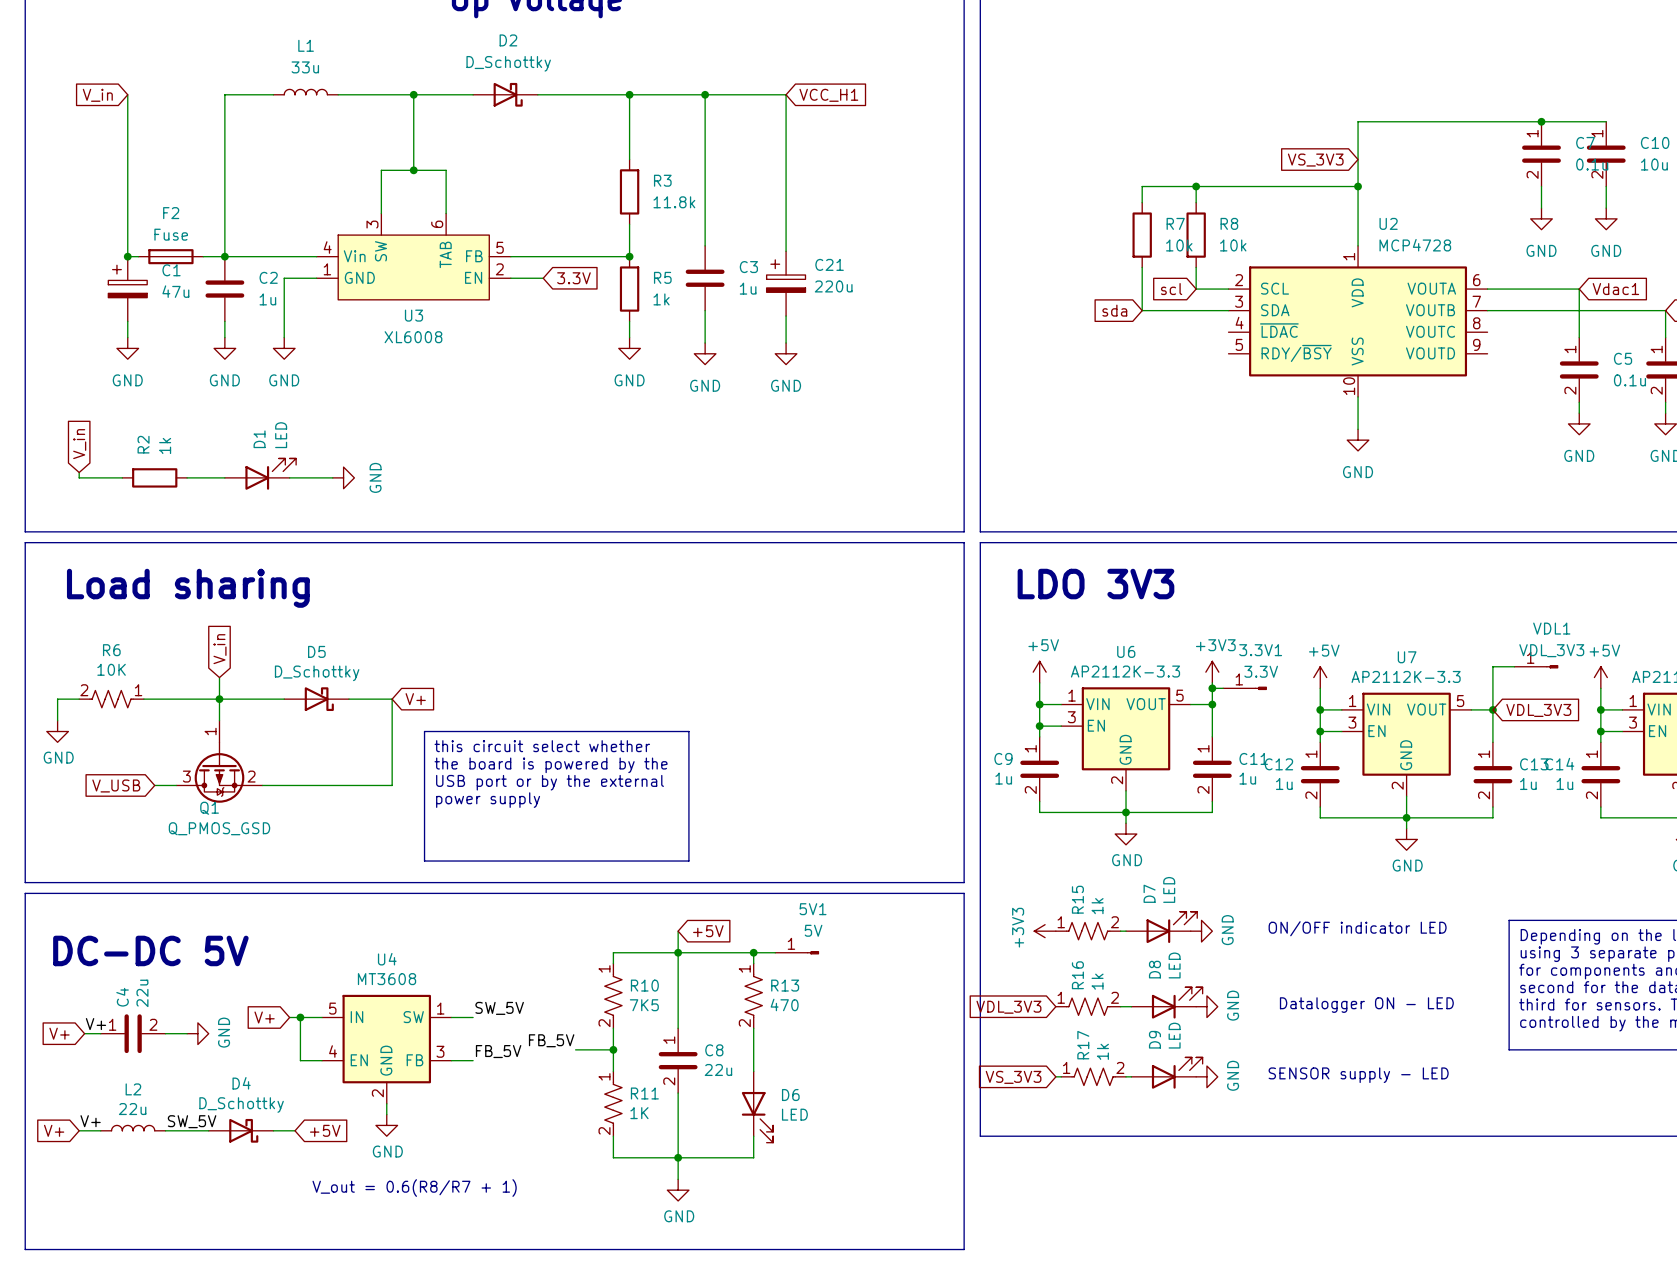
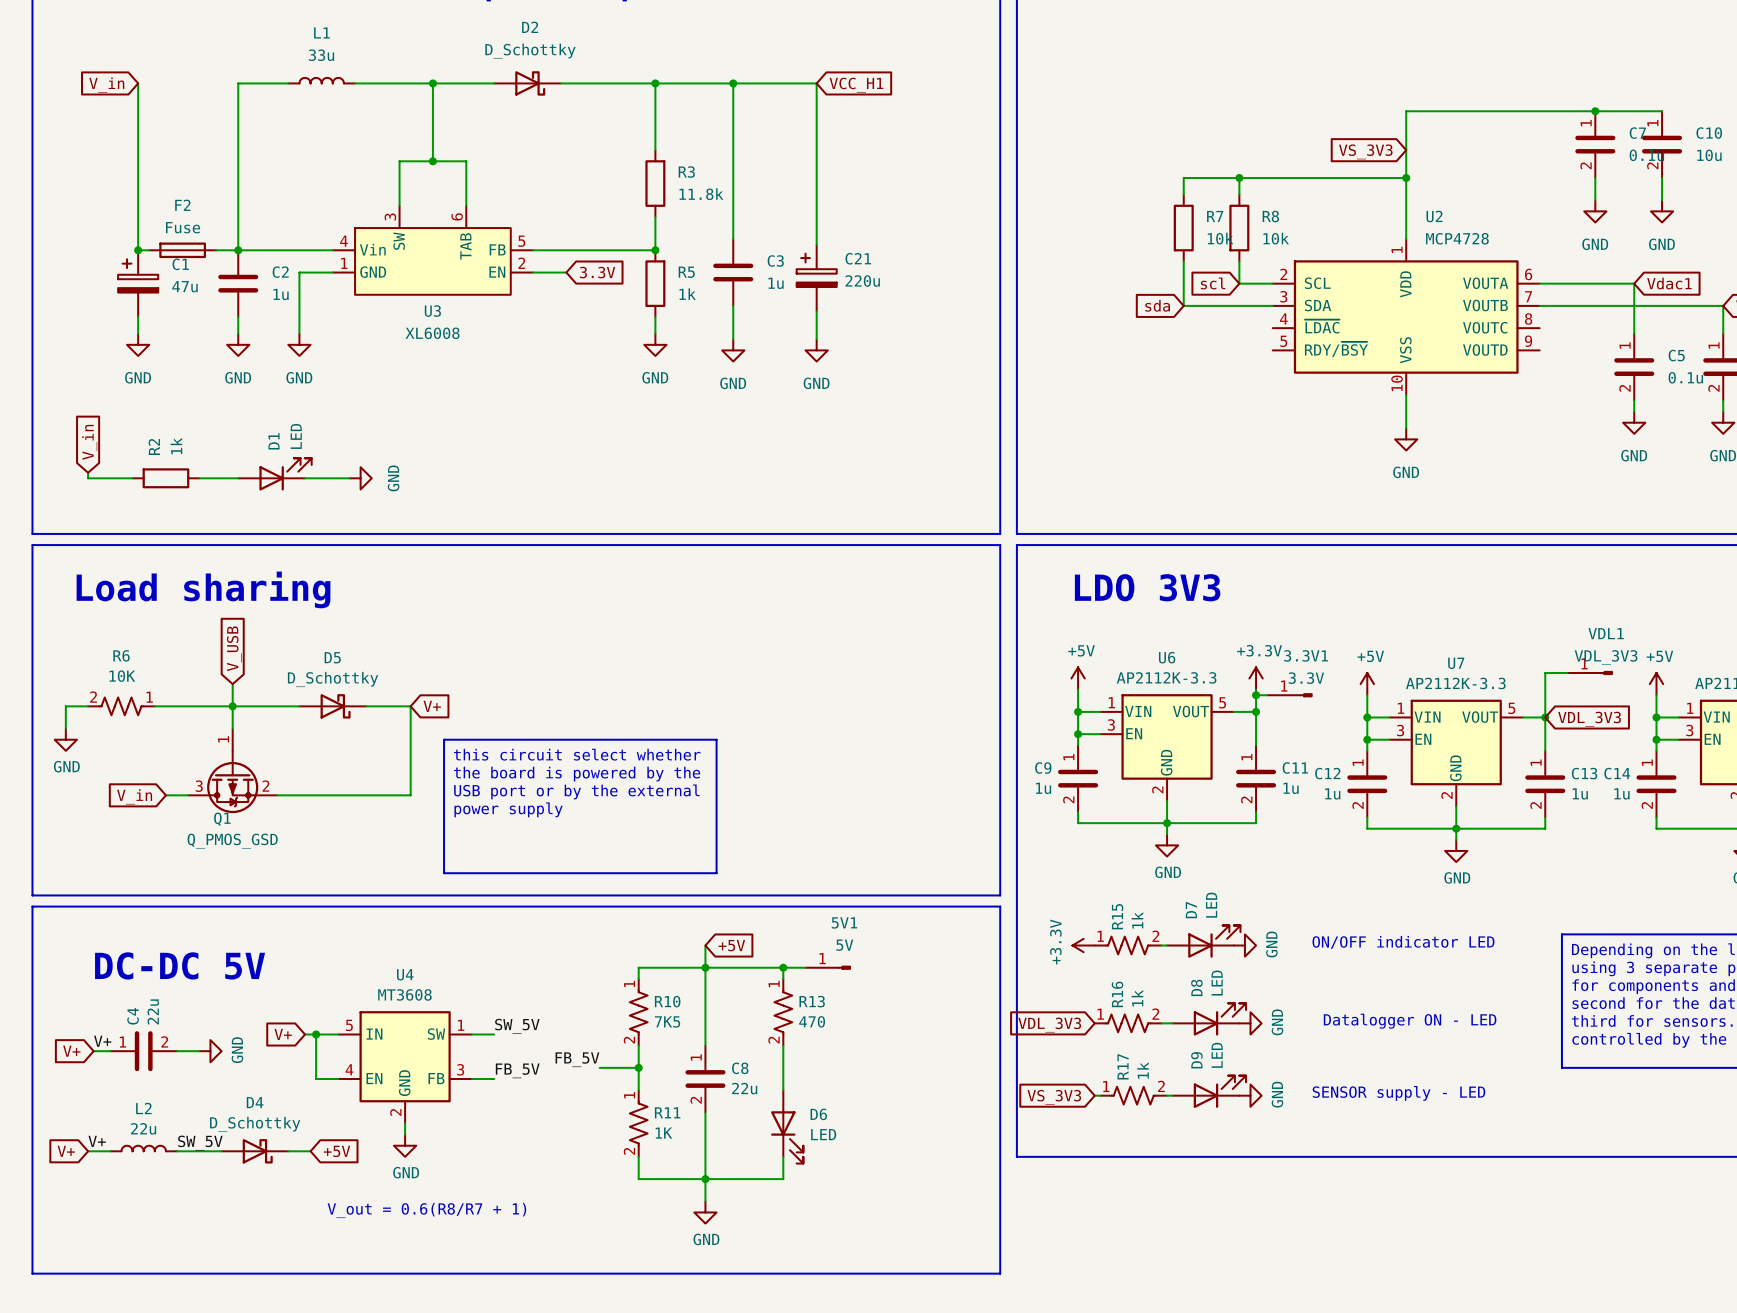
global label: V_in (220, 649) -> V_USB (234, 648)
power symbol: +3V3 (1212, 672) -> +3.3V (1256, 678)
global label: V_USB (116, 785) -> V_in (134, 796)
power symbol: +3V3 (1045, 931) -> +3.3V (1083, 945)

